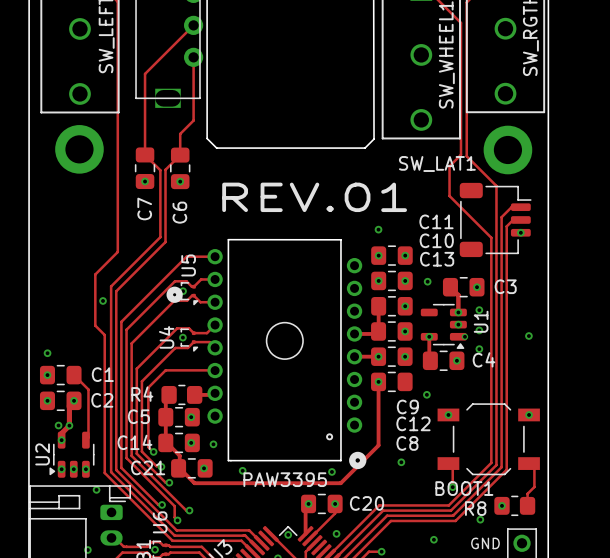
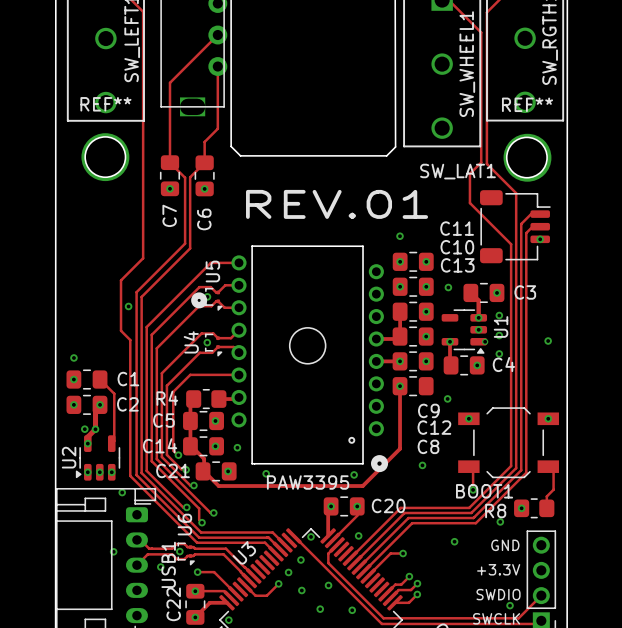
REF**: none -> (105, 157)
REF**: none -> (526, 157)

